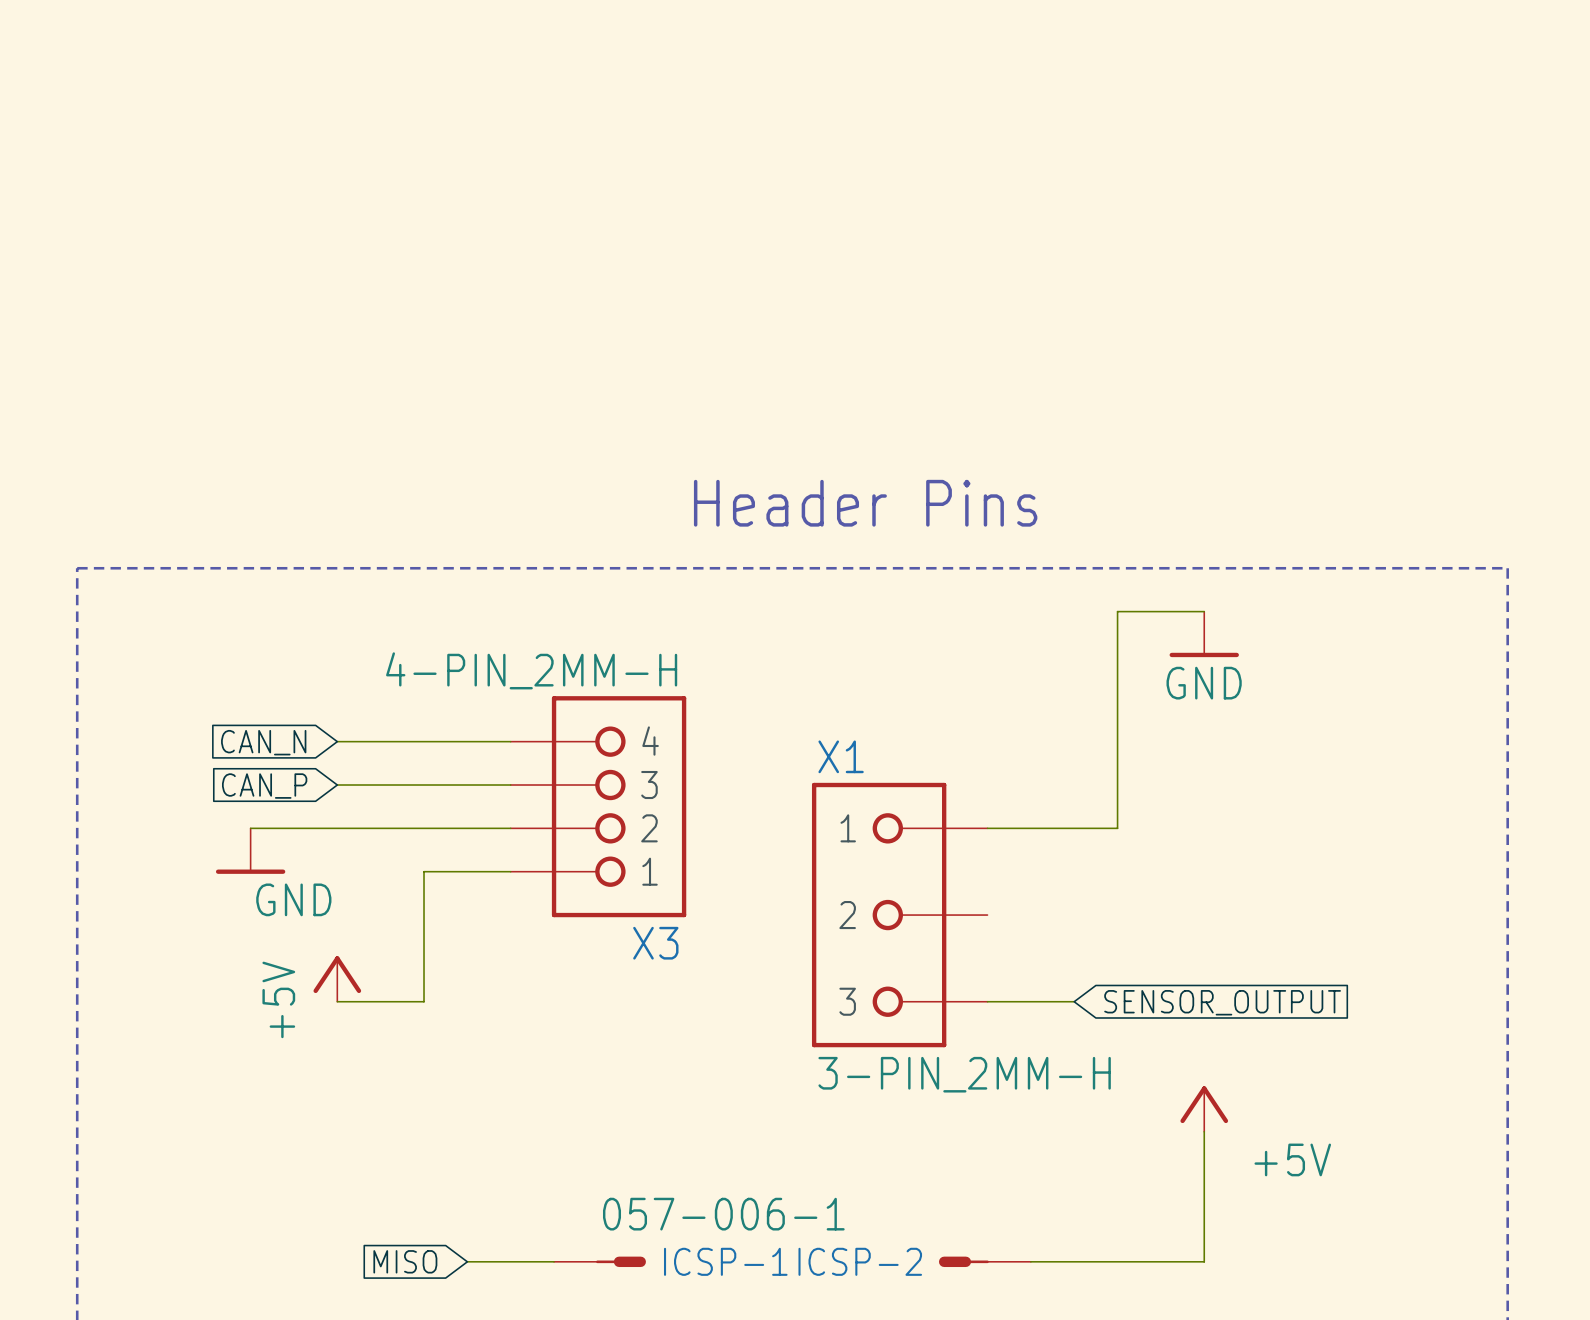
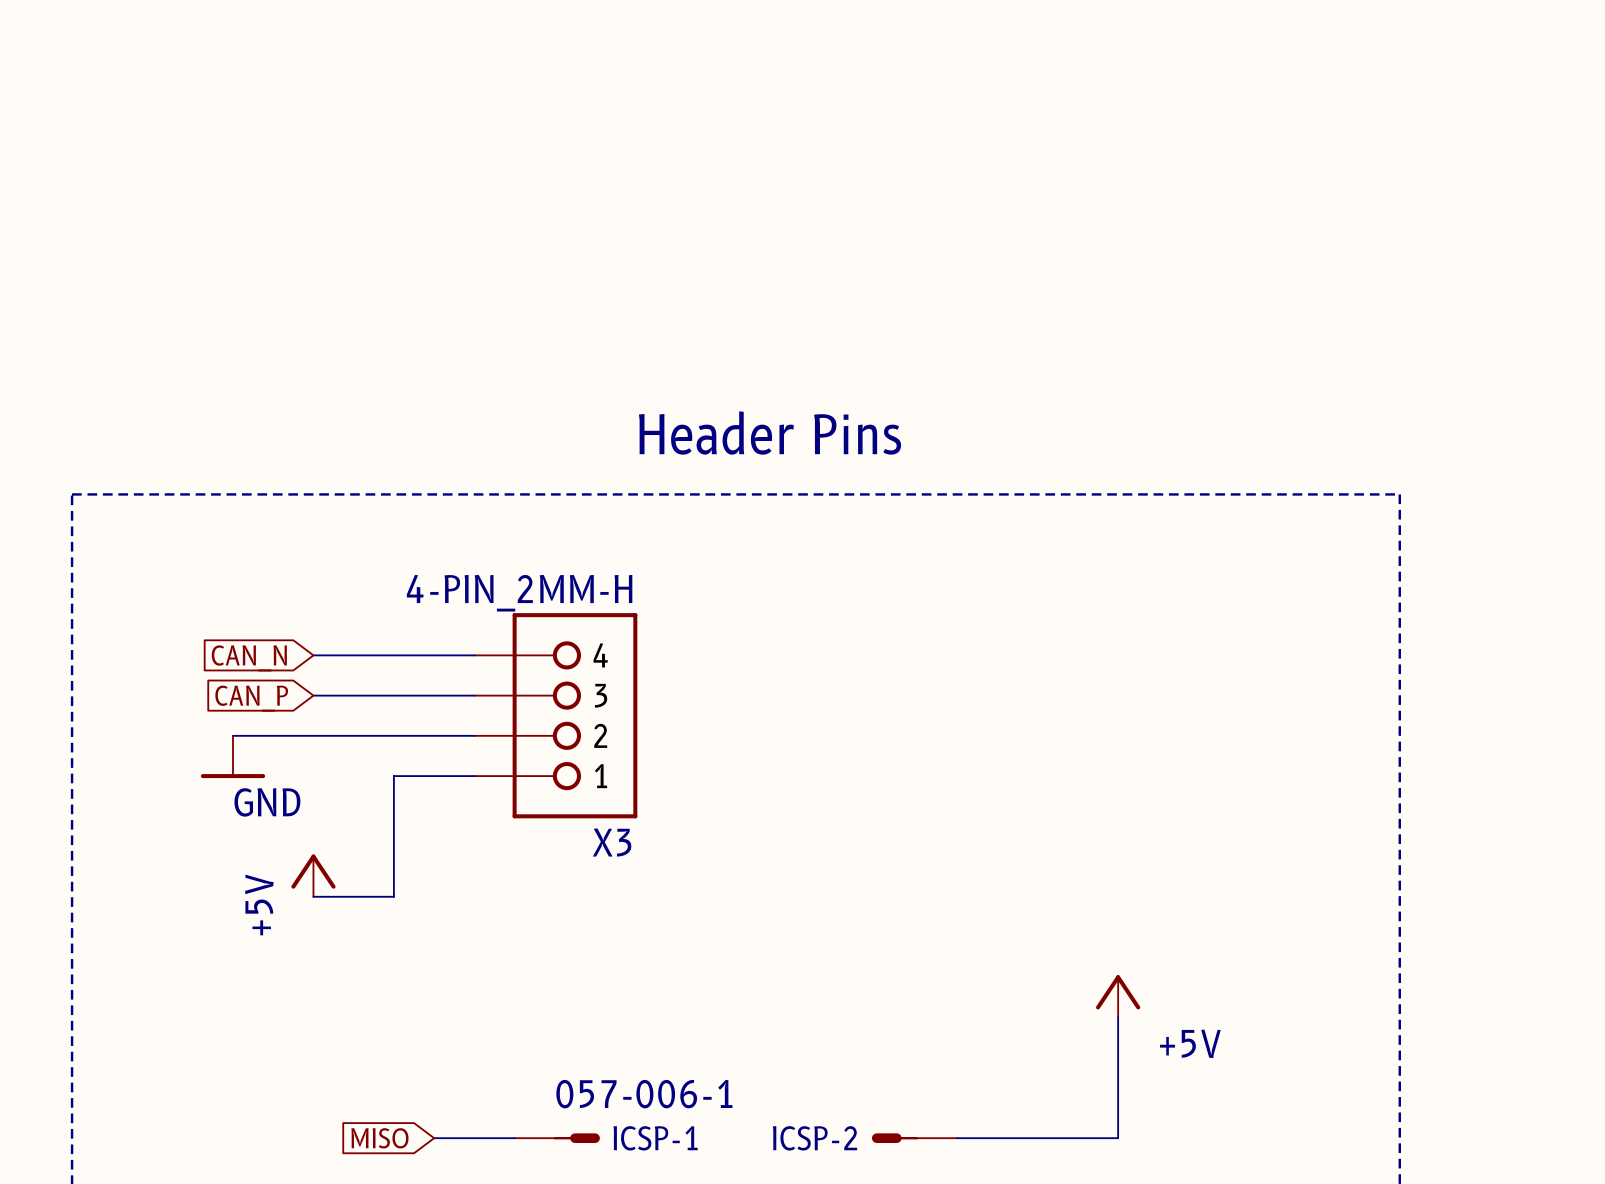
wire: (1204, 611) (1117, 611) (1117, 828) (987, 828) -> none
power symbol: GND (1204, 634) -> none
X1: 3-PIN_2MM-H (899, 915) -> none
wire: (987, 1001) (1074, 1001) -> none
global label: SENSOR_OUTPUT (1222, 1002) -> none

